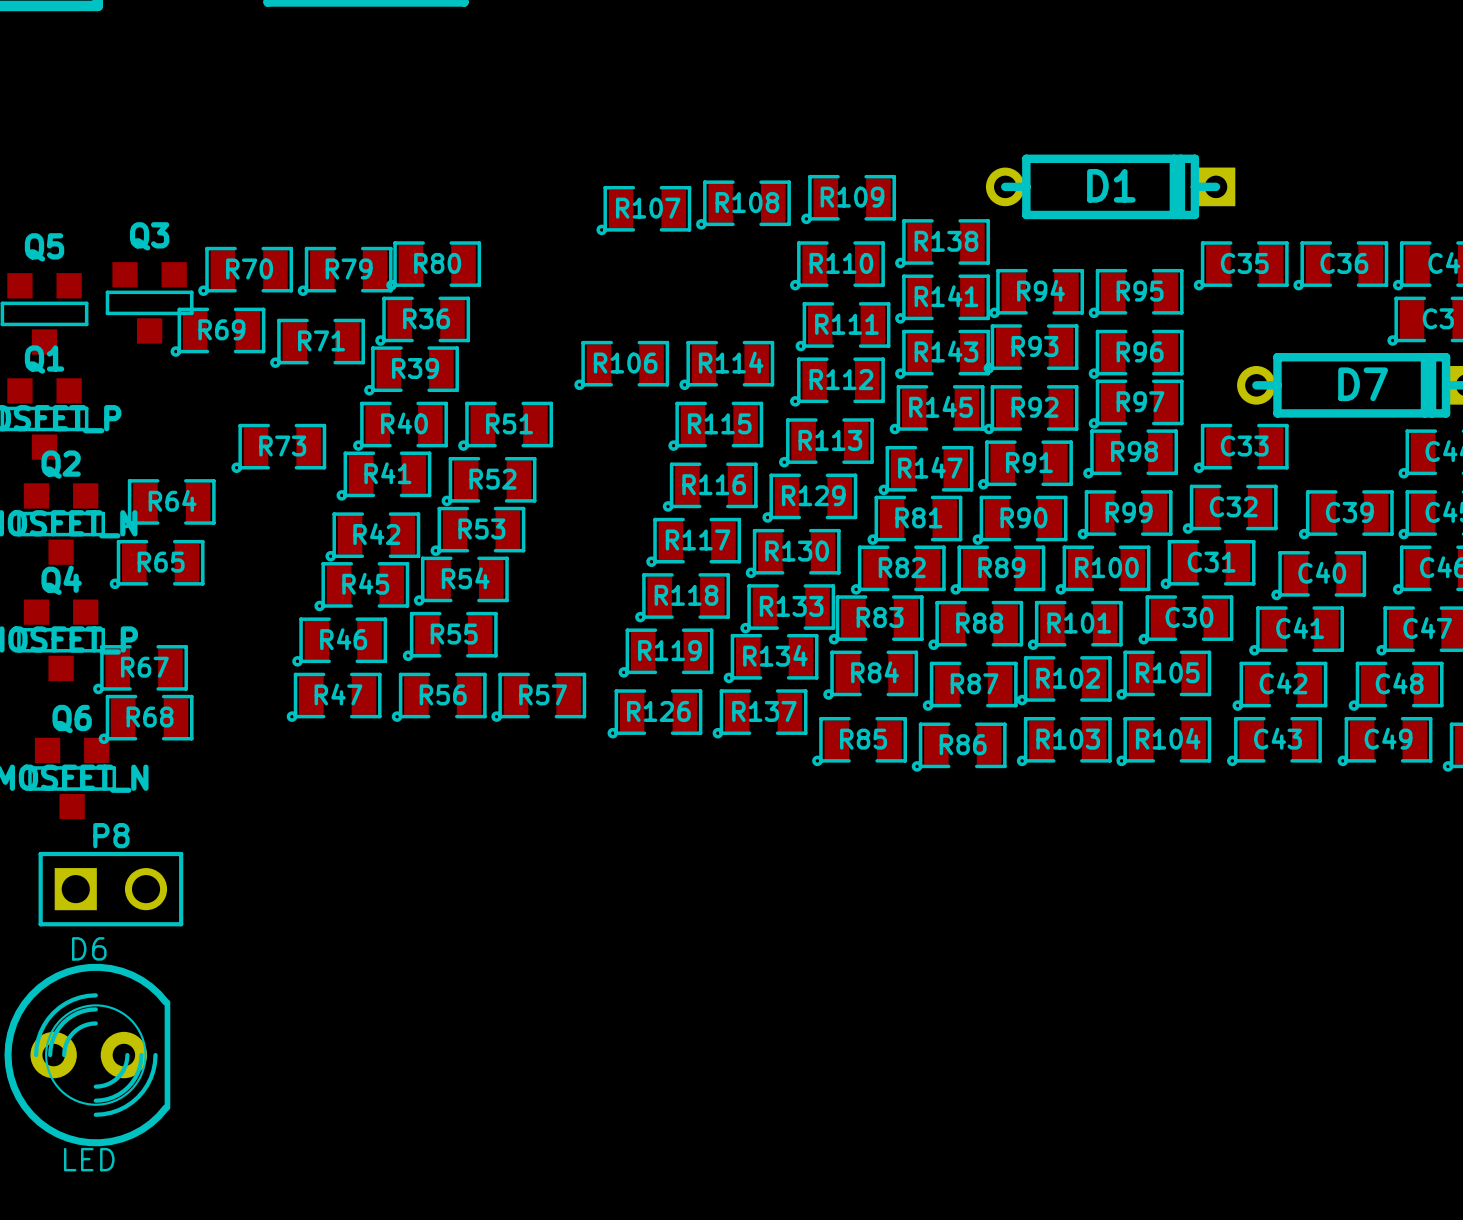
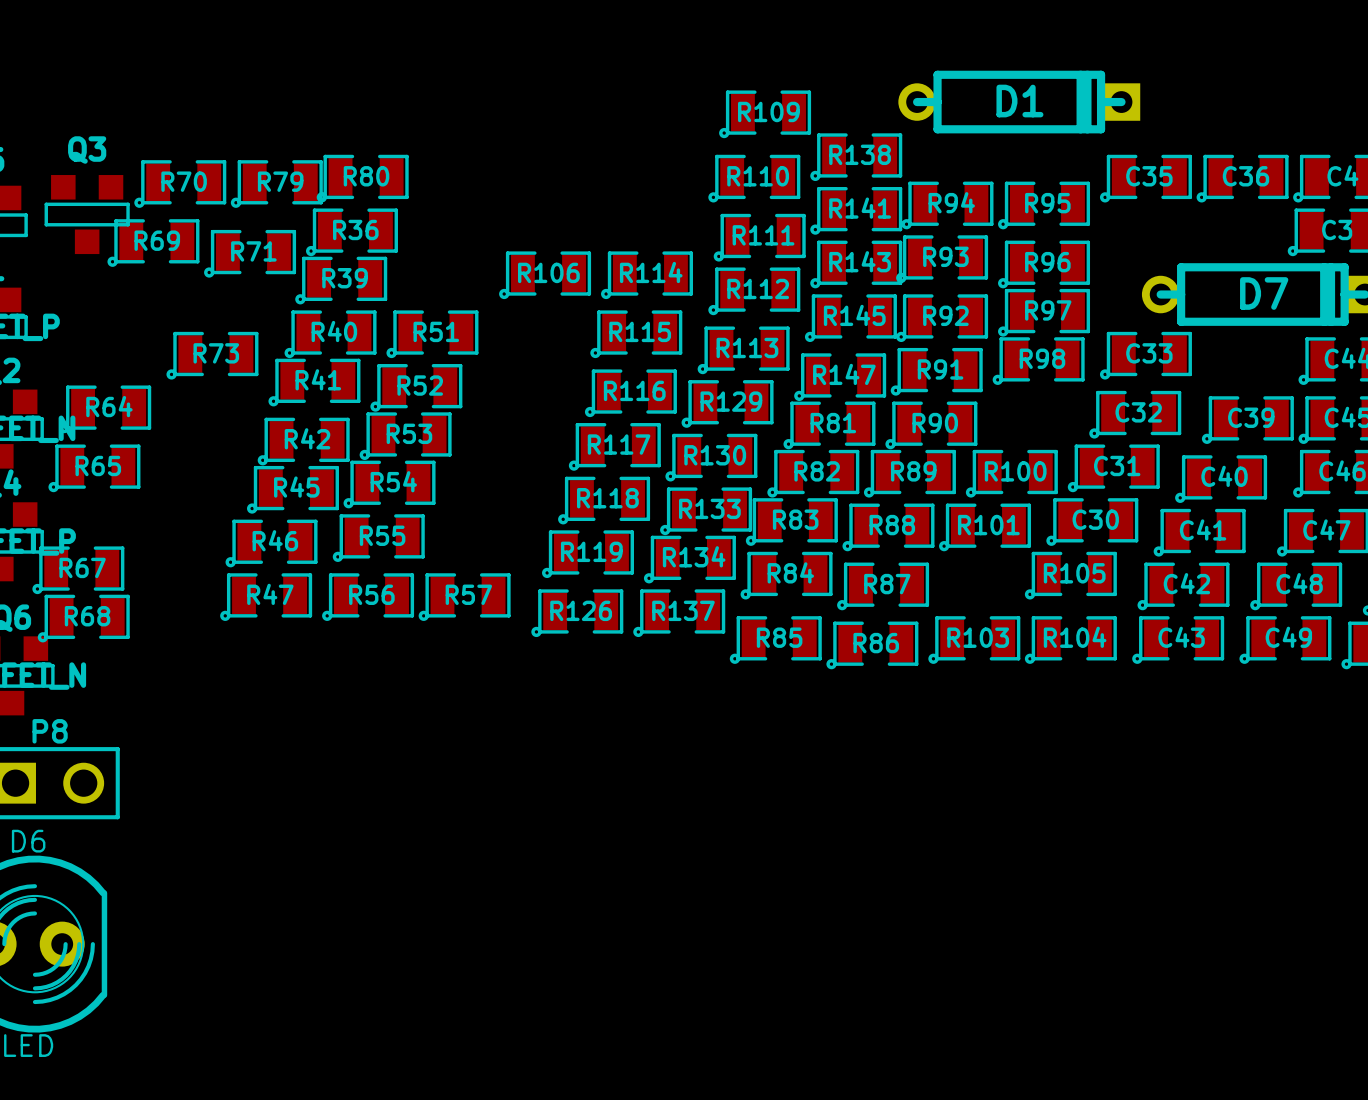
R108: (743, 205) -> none
R107: (643, 210) -> none
R99: (1125, 514) -> none
R102: (1064, 680) -> none

